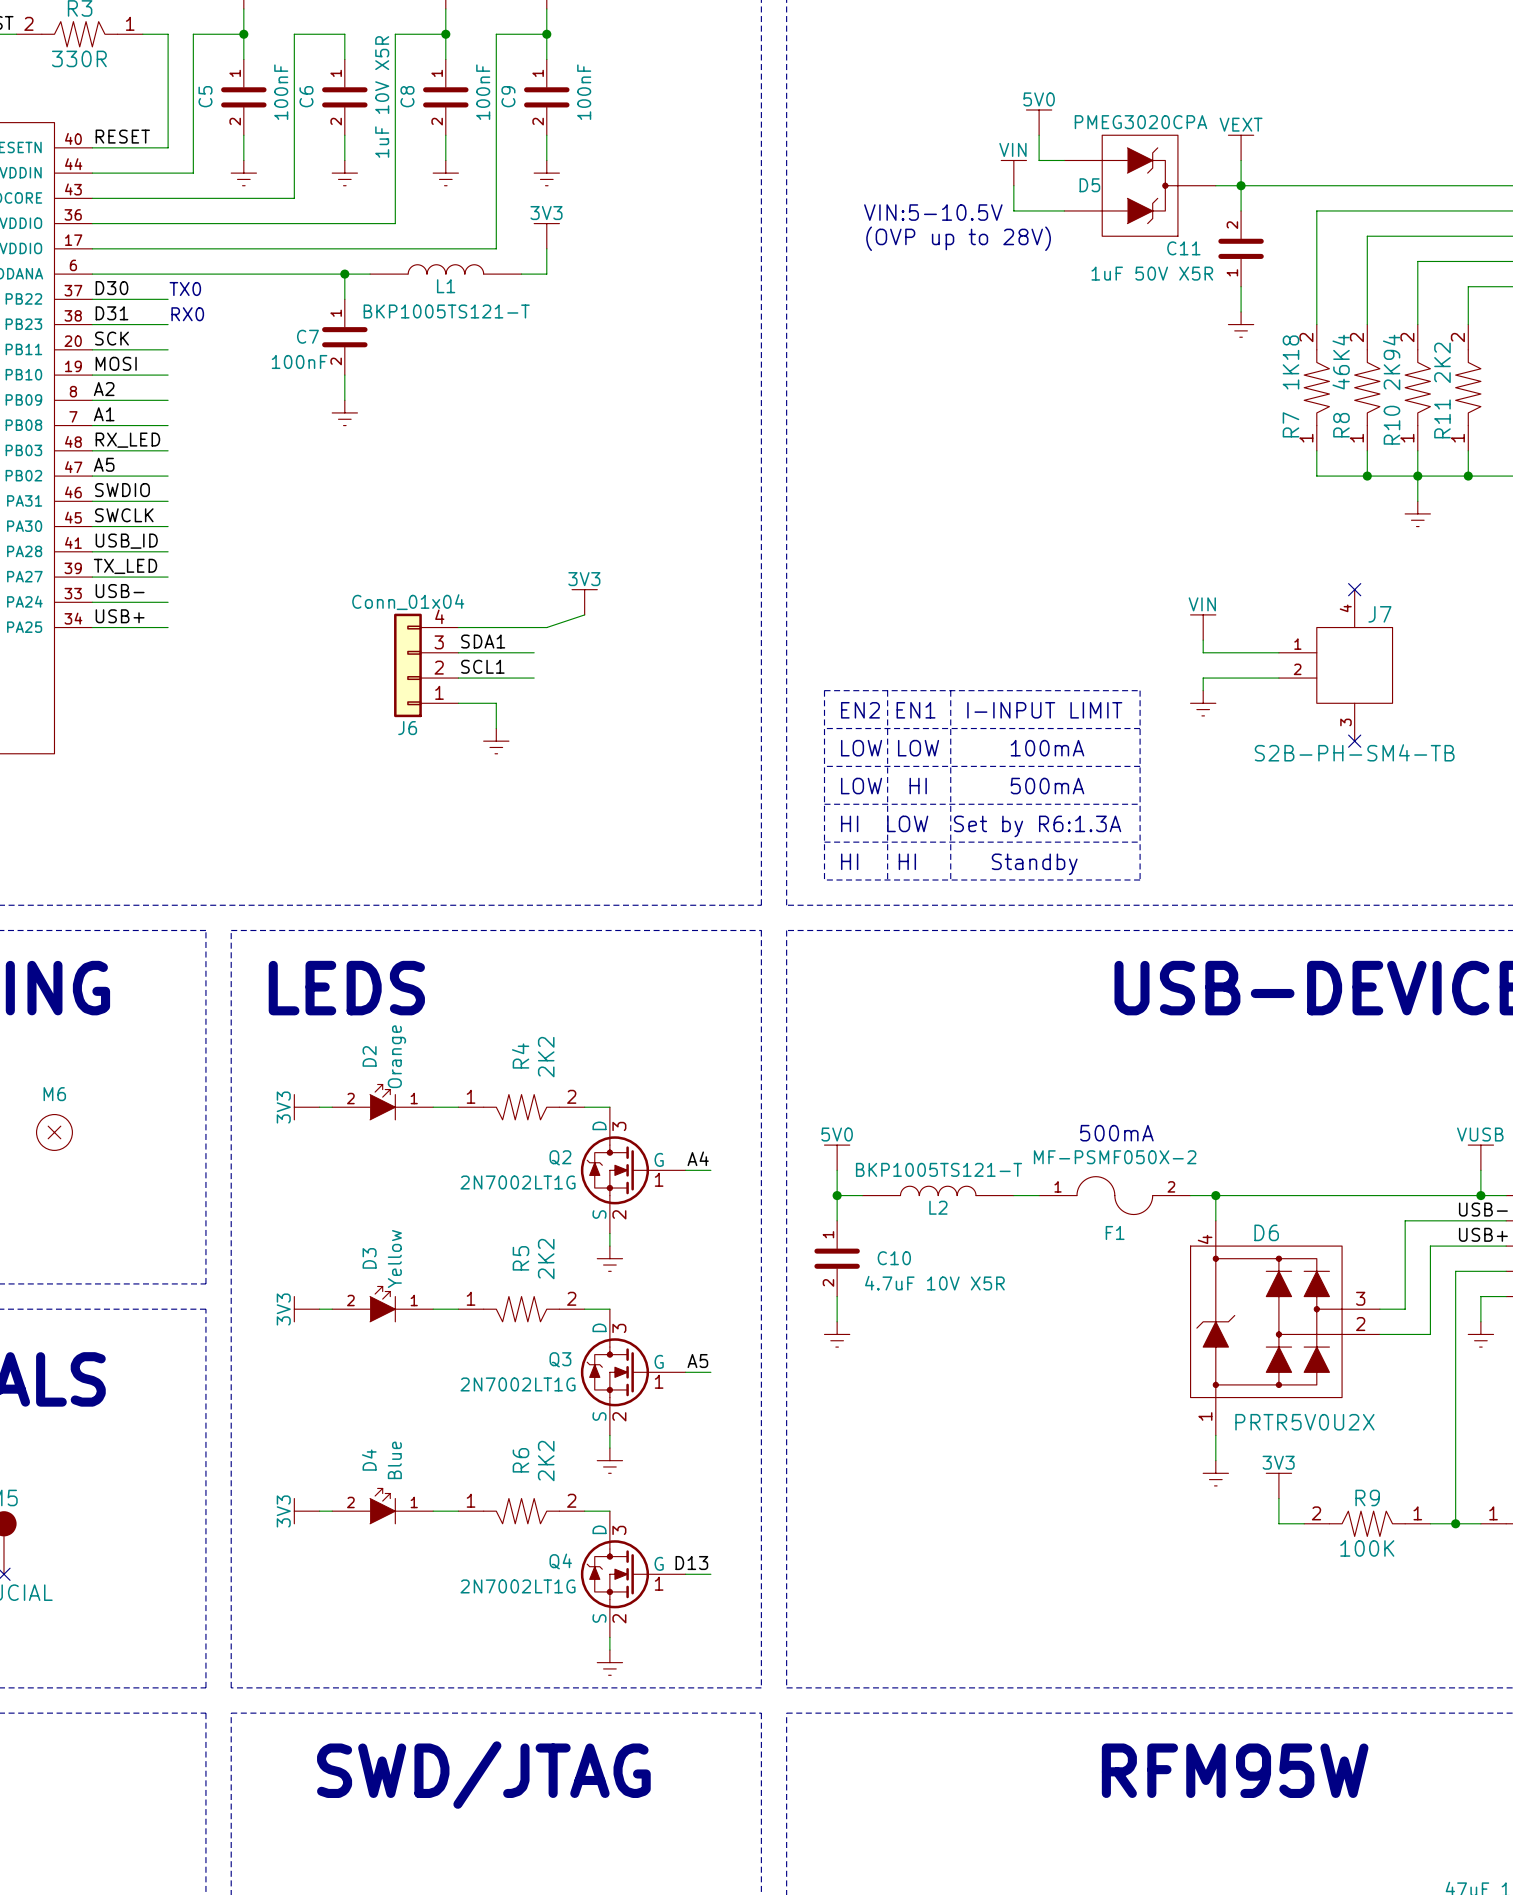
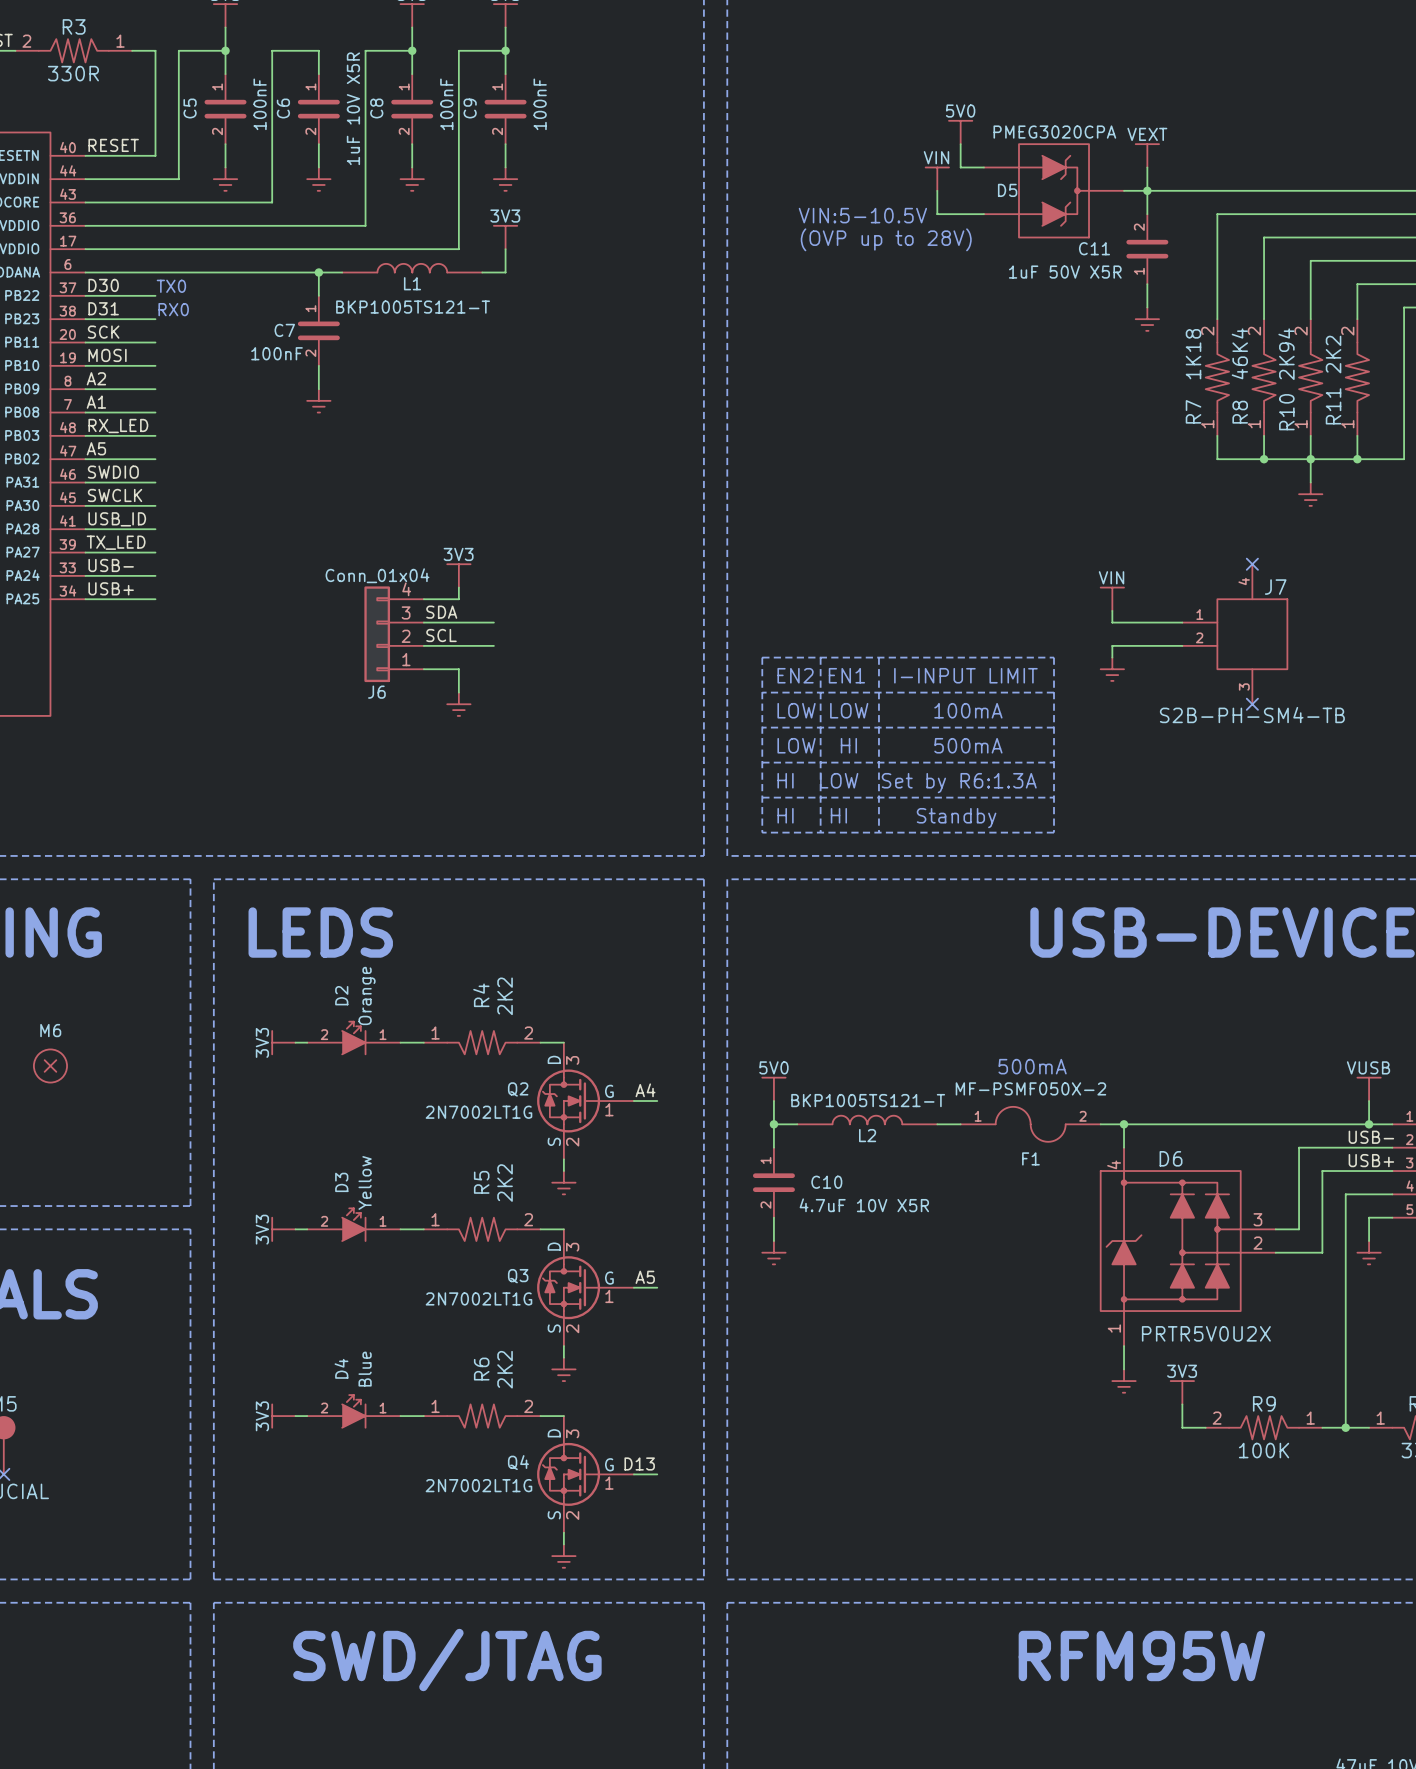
power symbol position: 3V3 (584, 602) -> 3V3 (458, 575)
wire: (584, 614) (546, 627) (496, 627) -> (458, 587) (458, 599)
label: SDA1 (483, 641) -> SDA (441, 612)
label: SCL1 (482, 666) -> SCL (441, 635)

